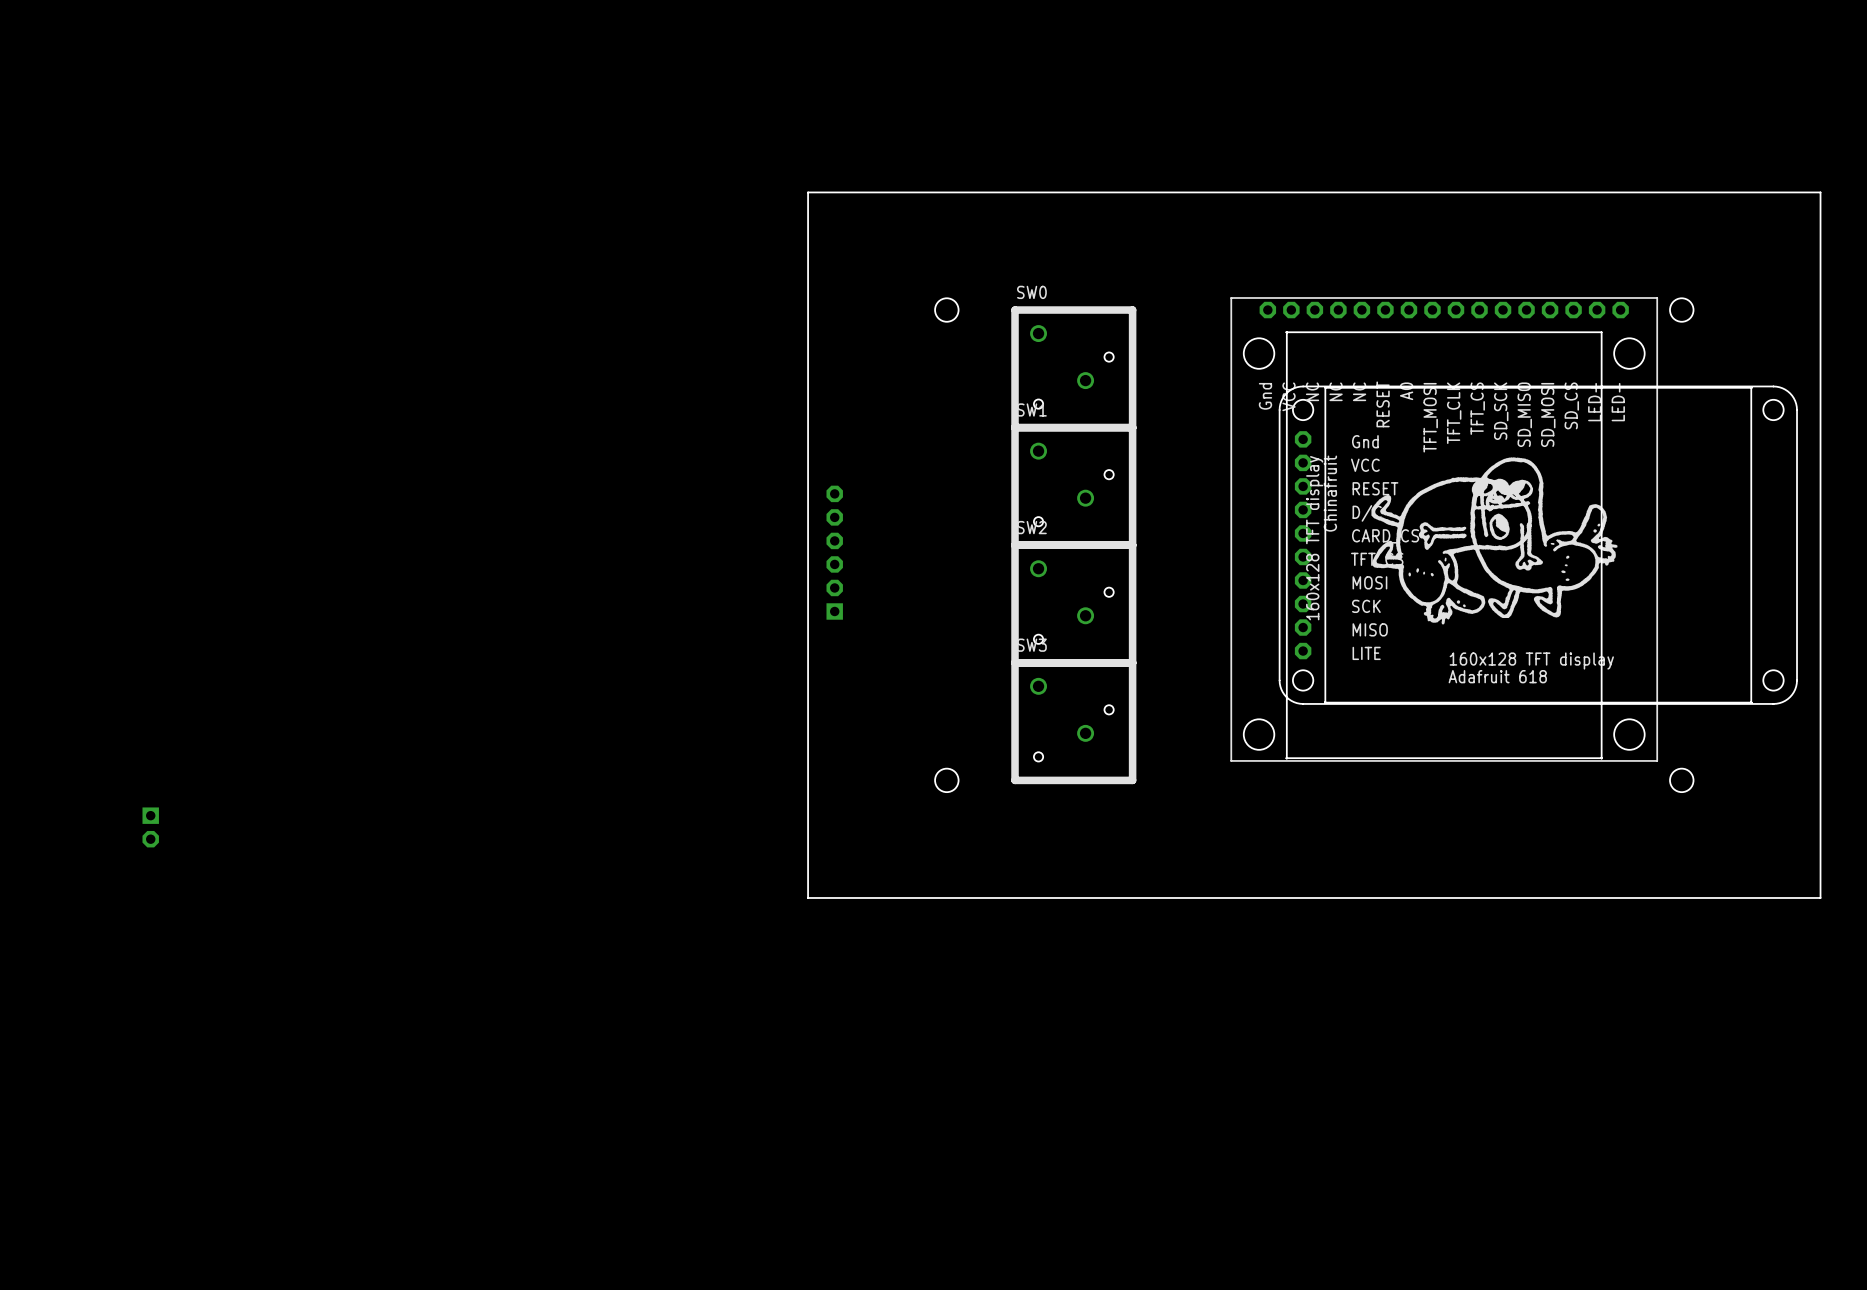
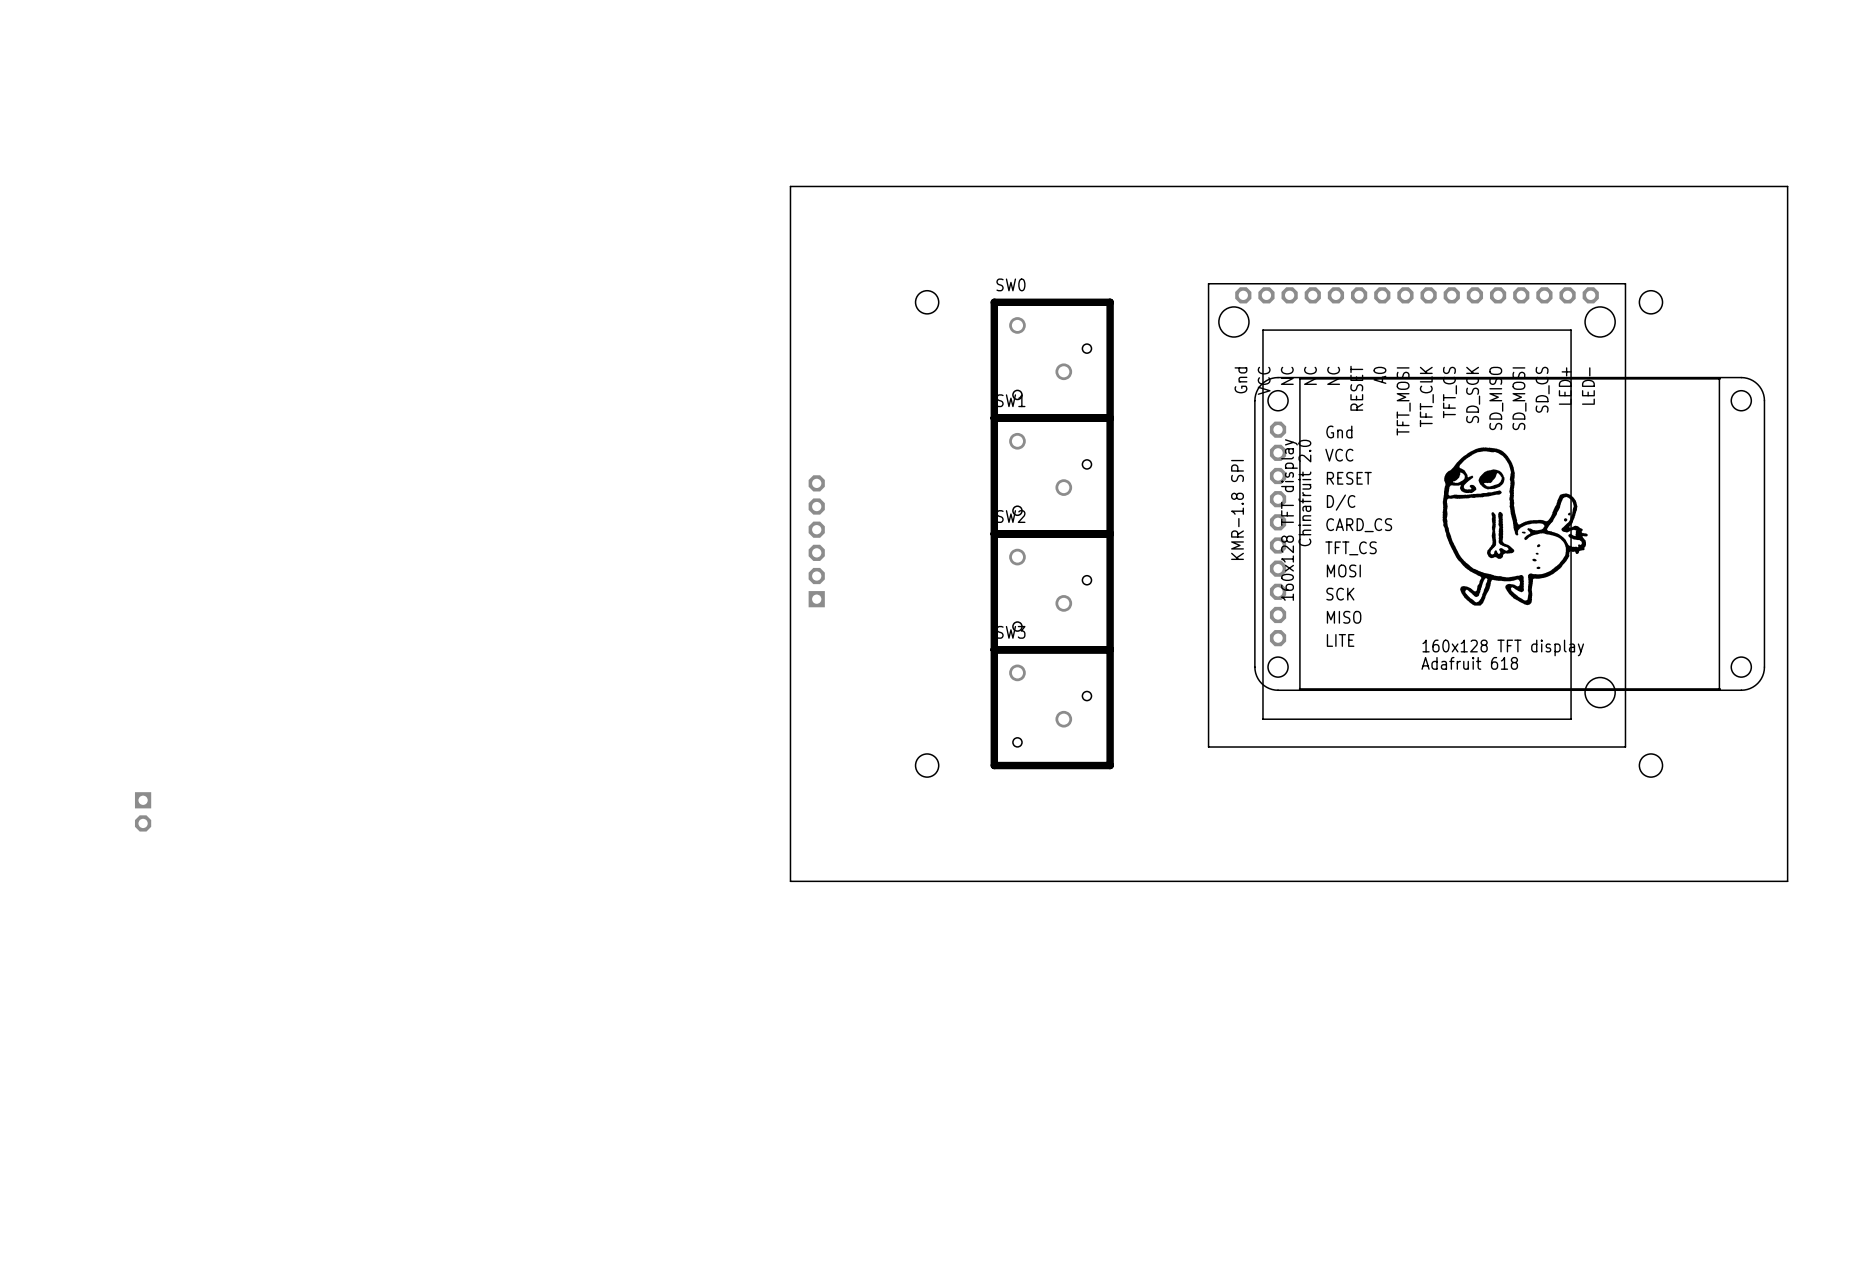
part footprint: [1230, 297, 1658, 762] -> [1207, 283, 1627, 748]

